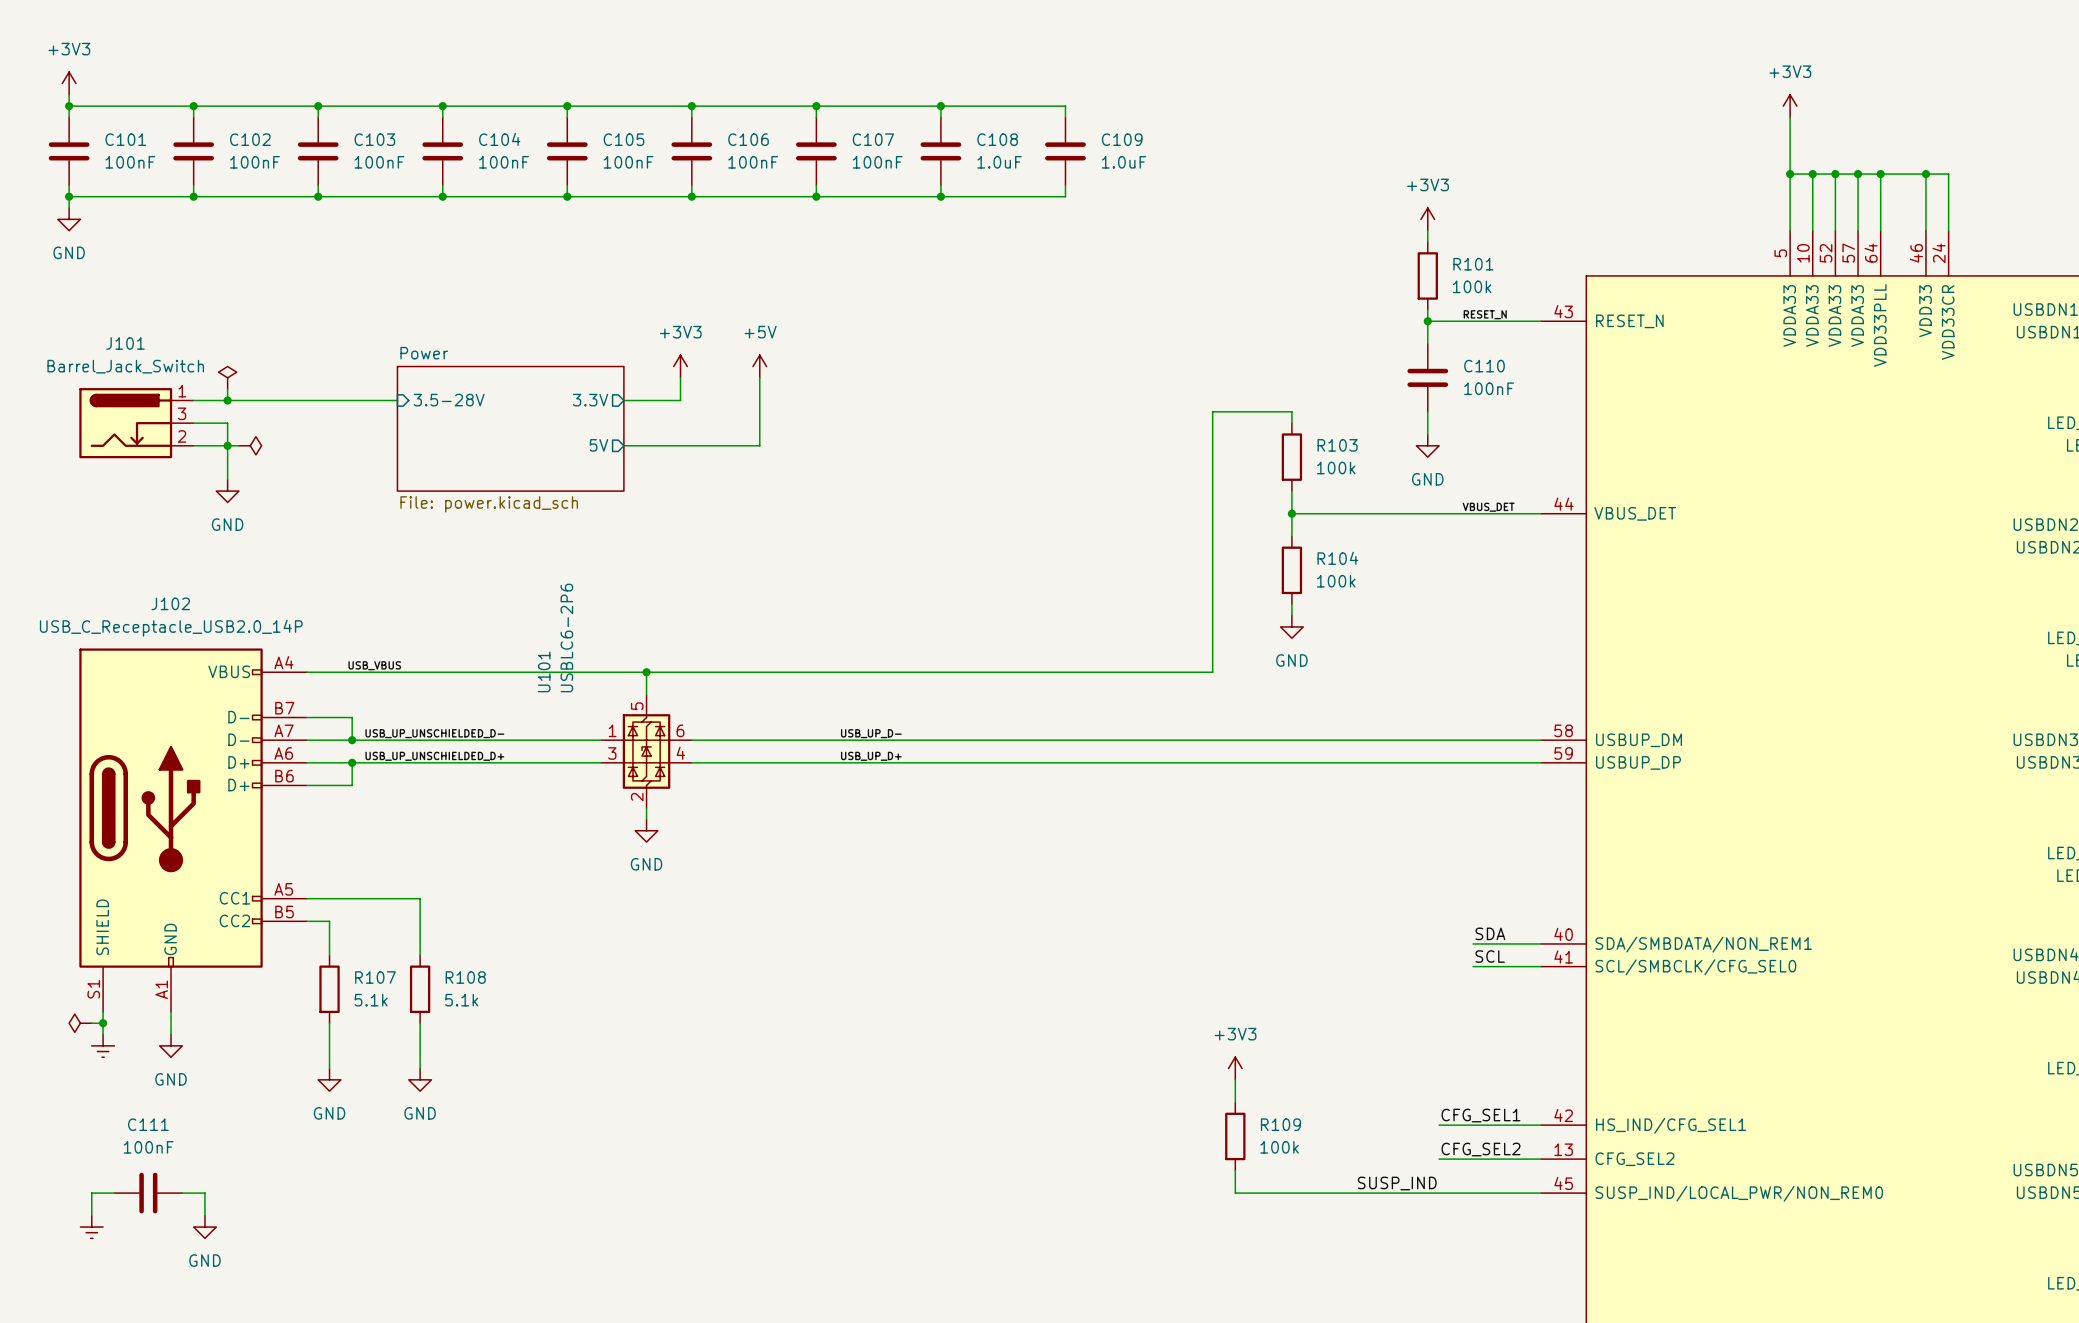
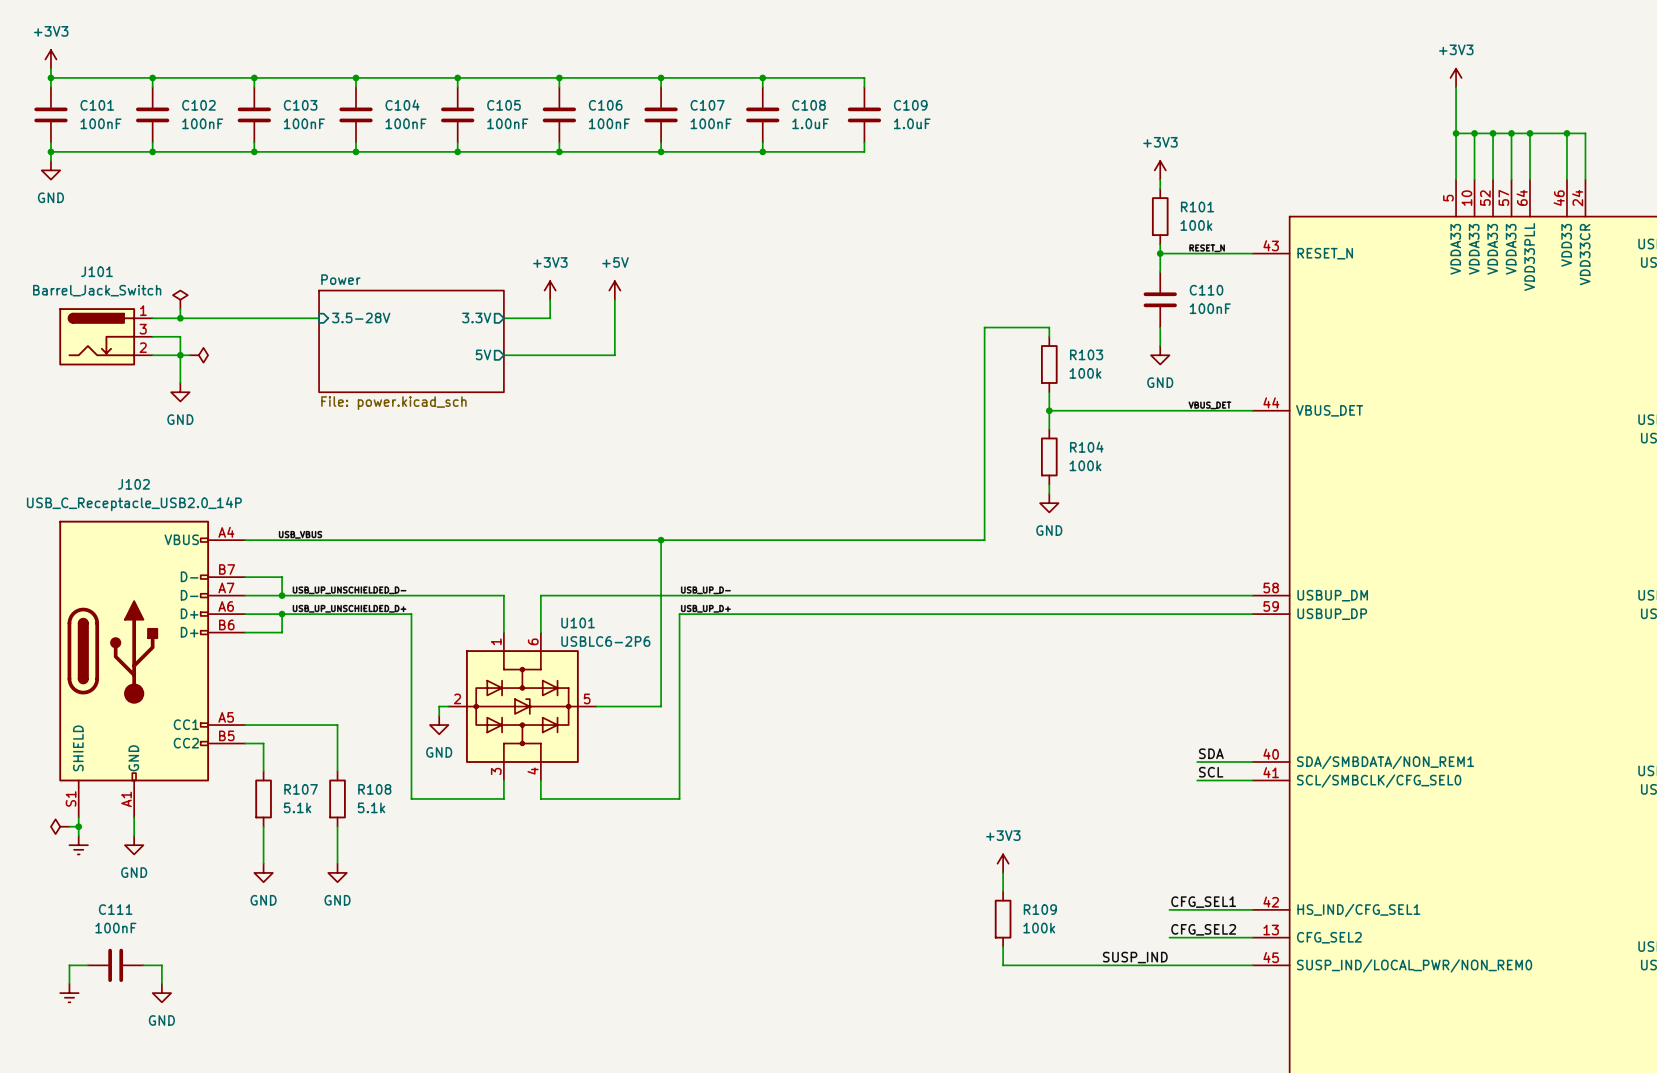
U101 value position: USBLC6-2P6 (566, 638) -> USBLC6-2P6 (605, 641)
U101 name position: U101 (544, 671) -> U101 (578, 623)
wire: (646, 672) (646, 694) -> none
junction: (646, 672) -> none
wire: none -> (661, 540) (661, 706) (596, 706)
junction: none -> (661, 540)
U101 symbol: [601, 694, 692, 809] -> [448, 632, 597, 781]
wire: (510, 762) (601, 762) -> (411, 614) (411, 798) (503, 798) (503, 780)
wire: (691, 762) (839, 762) -> (540, 780) (540, 798) (679, 798) (679, 614)
power symbol position: GND (646, 830) -> GND (439, 725)
wire: none -> (448, 706) (439, 706) (439, 715)

